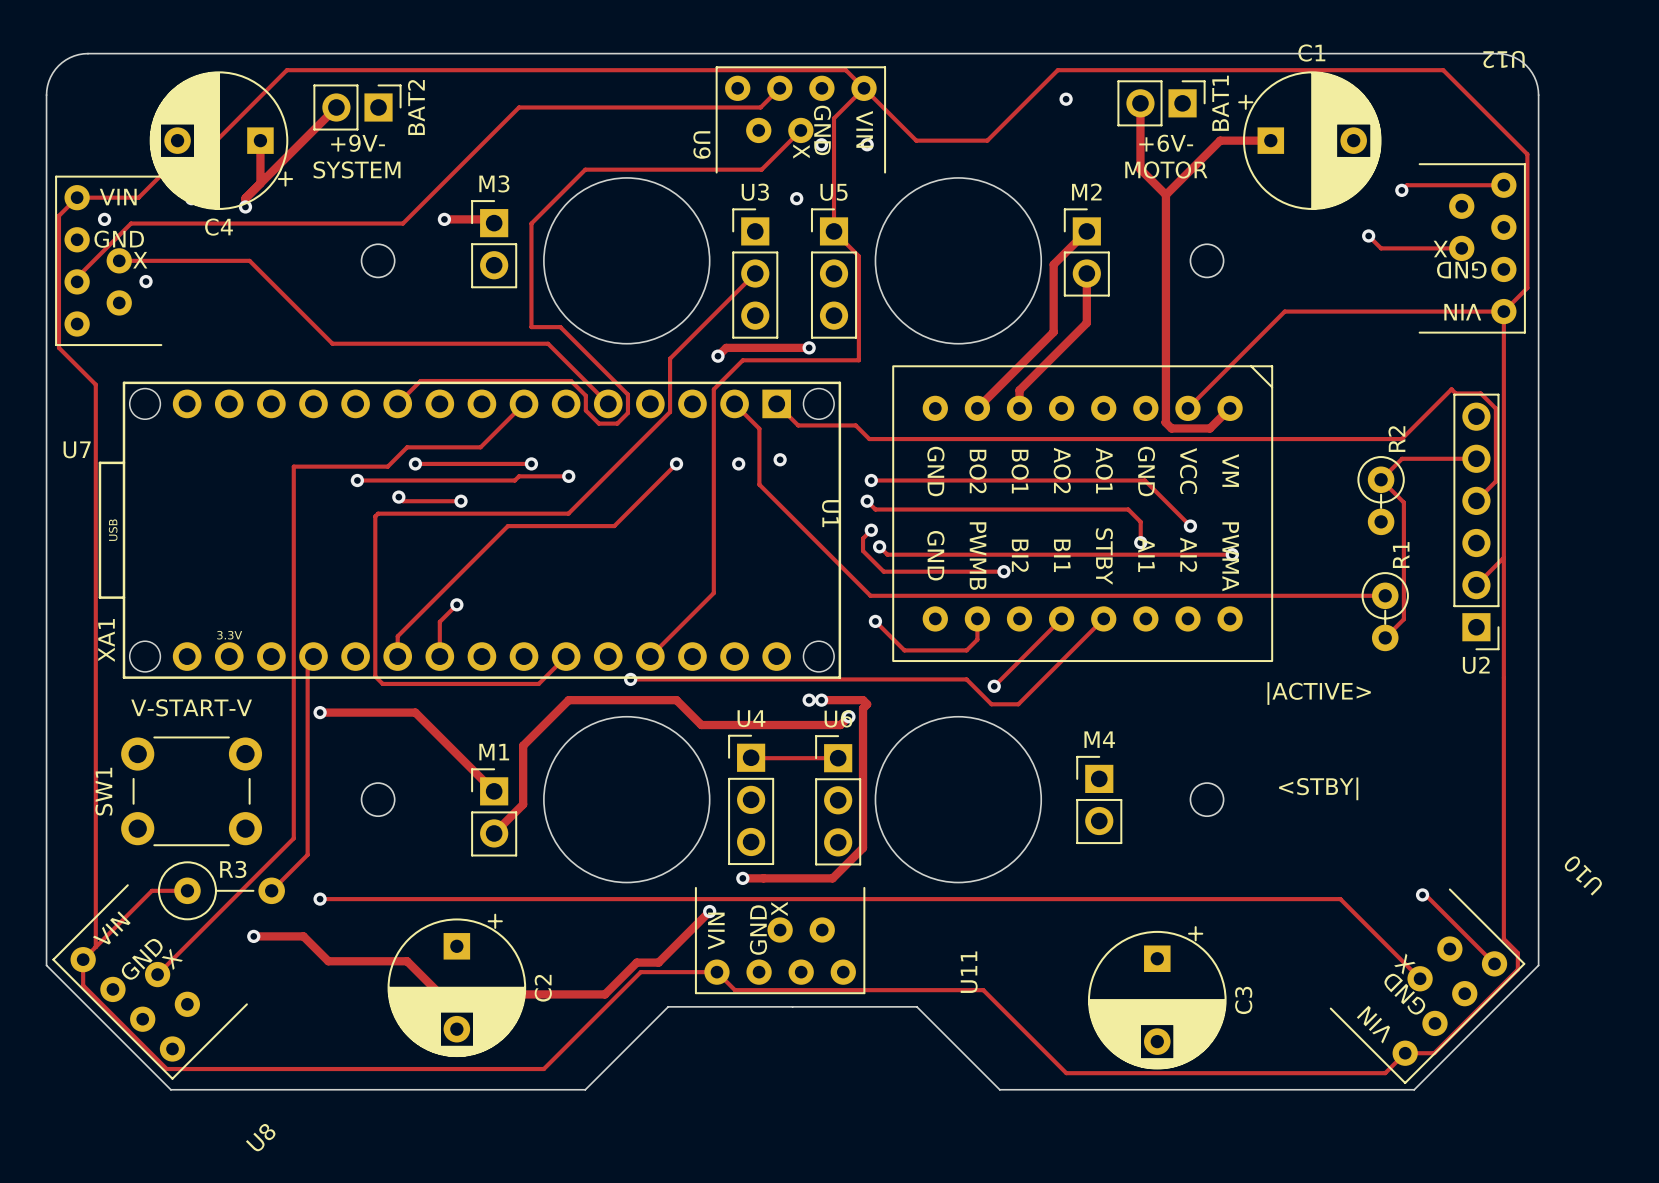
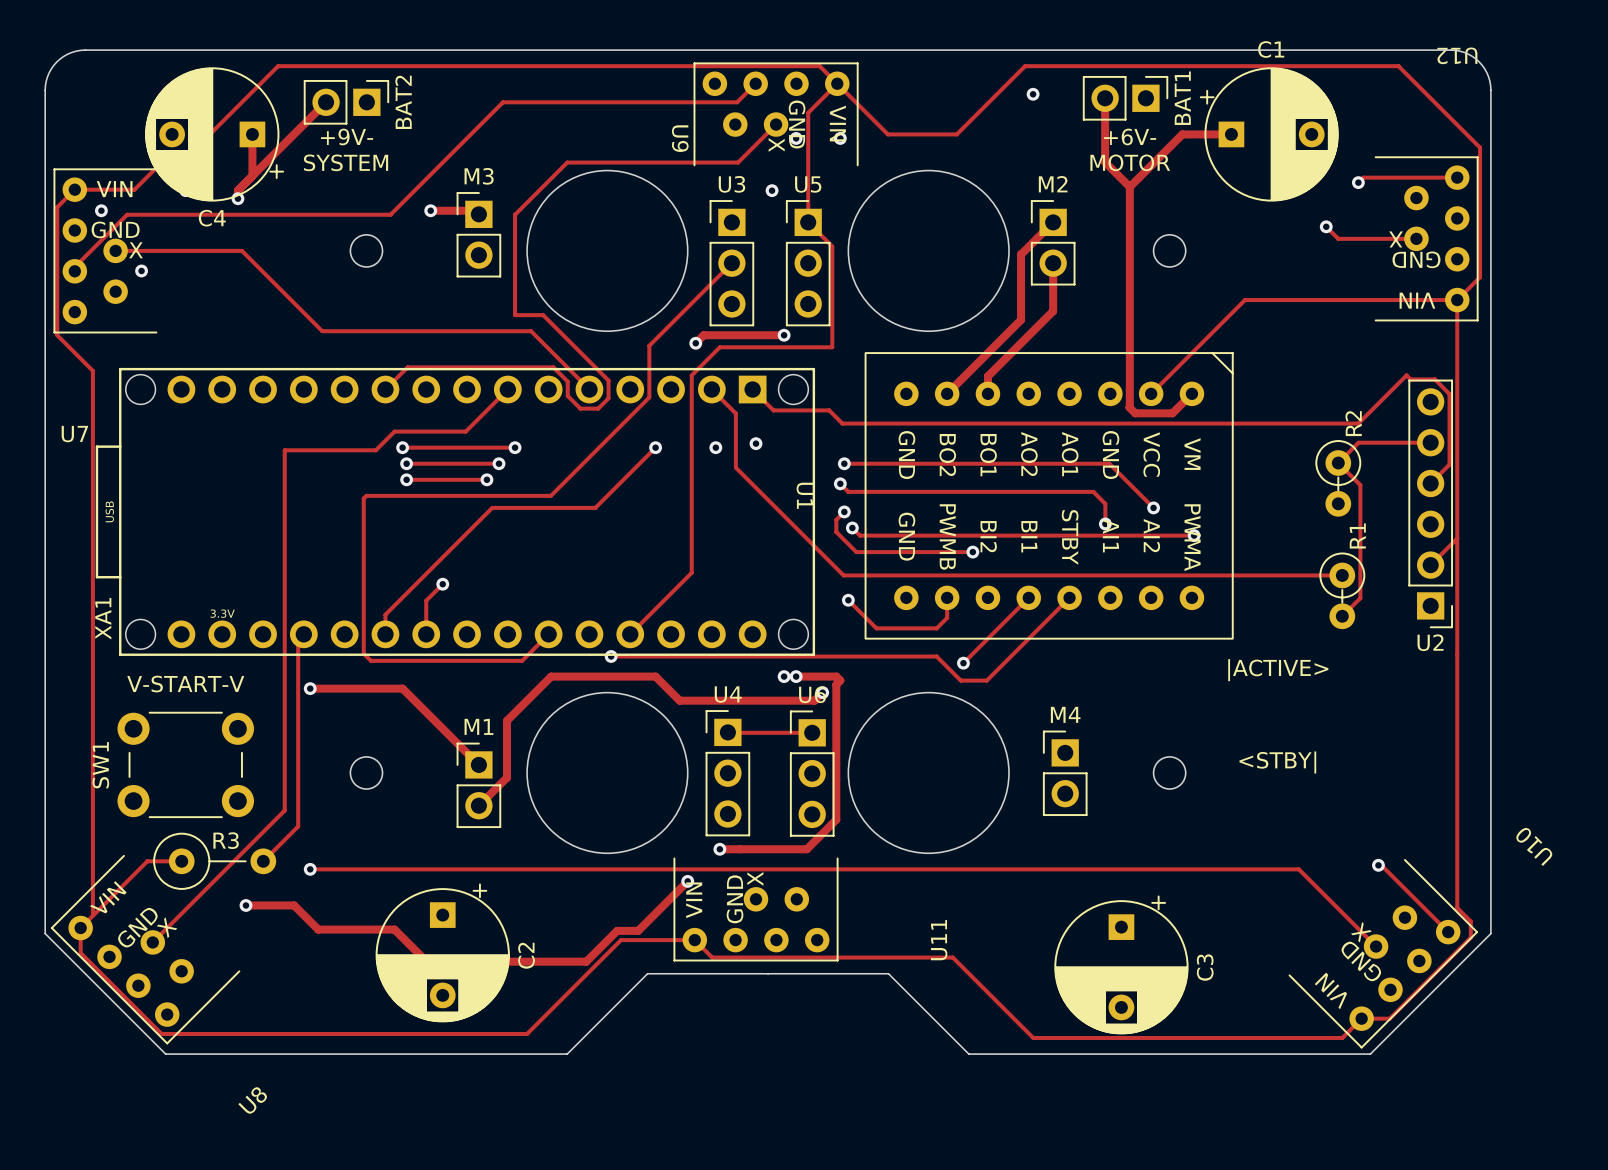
track: (568, 476) (519, 476) (514, 480) -> none
via: (568, 476) -> none
track: (357, 480) (419, 480) -> none
via: (357, 480) -> none
via: none -> (406, 463)
via: none -> (498, 463)
track: (398, 497) (402, 501) (461, 501) -> none
via: (398, 497) -> none
track: none -> (406, 479) (486, 479)
via: none -> (406, 479)
via: none -> (486, 479)
via: (461, 501) -> none

